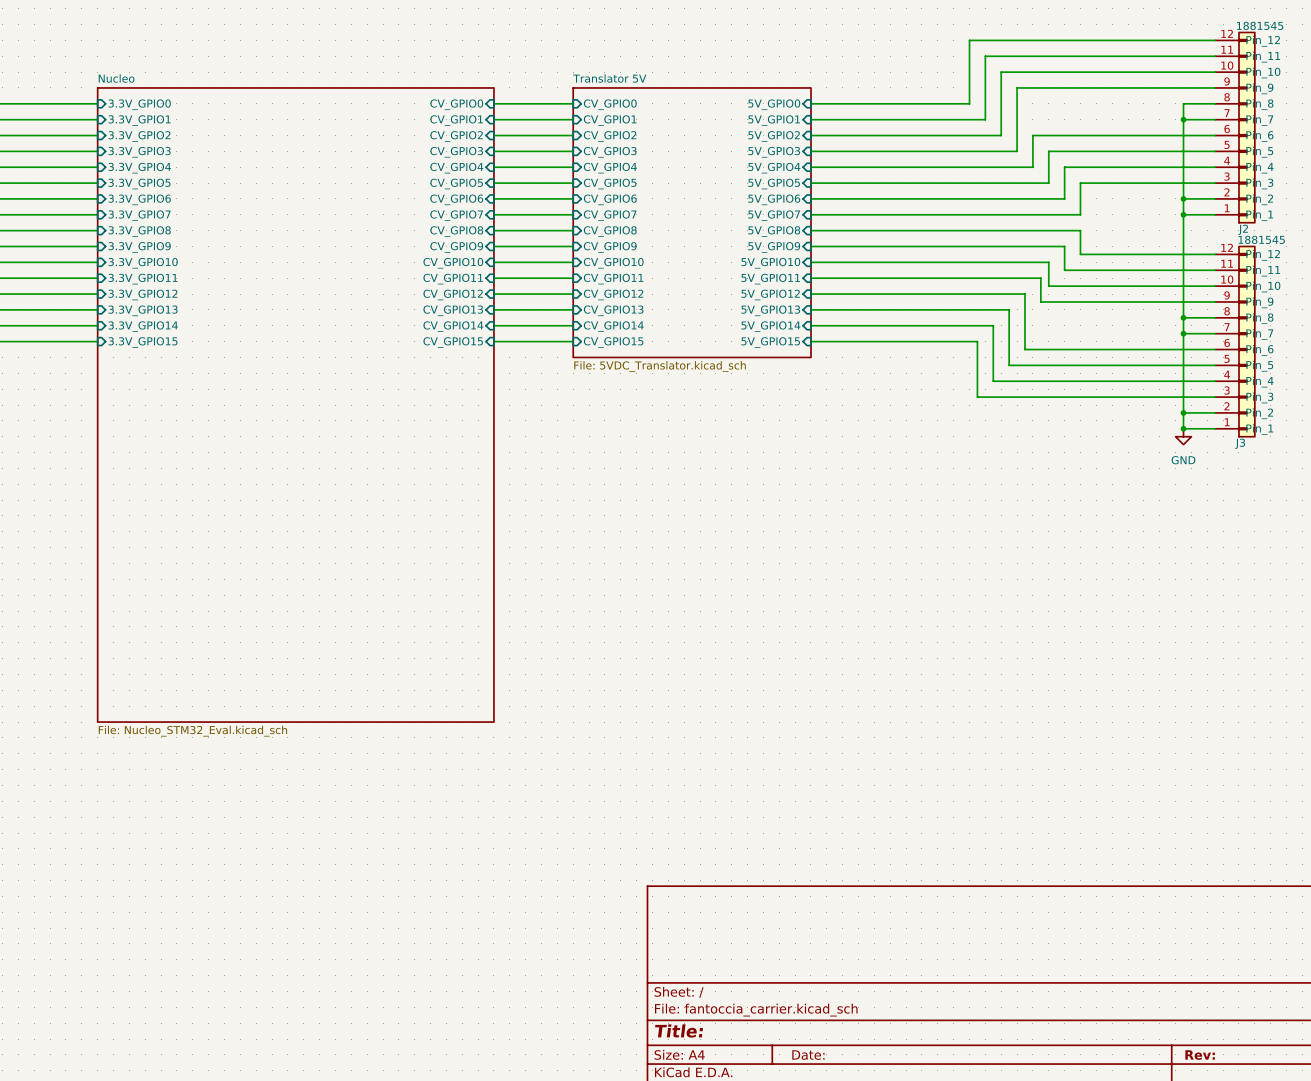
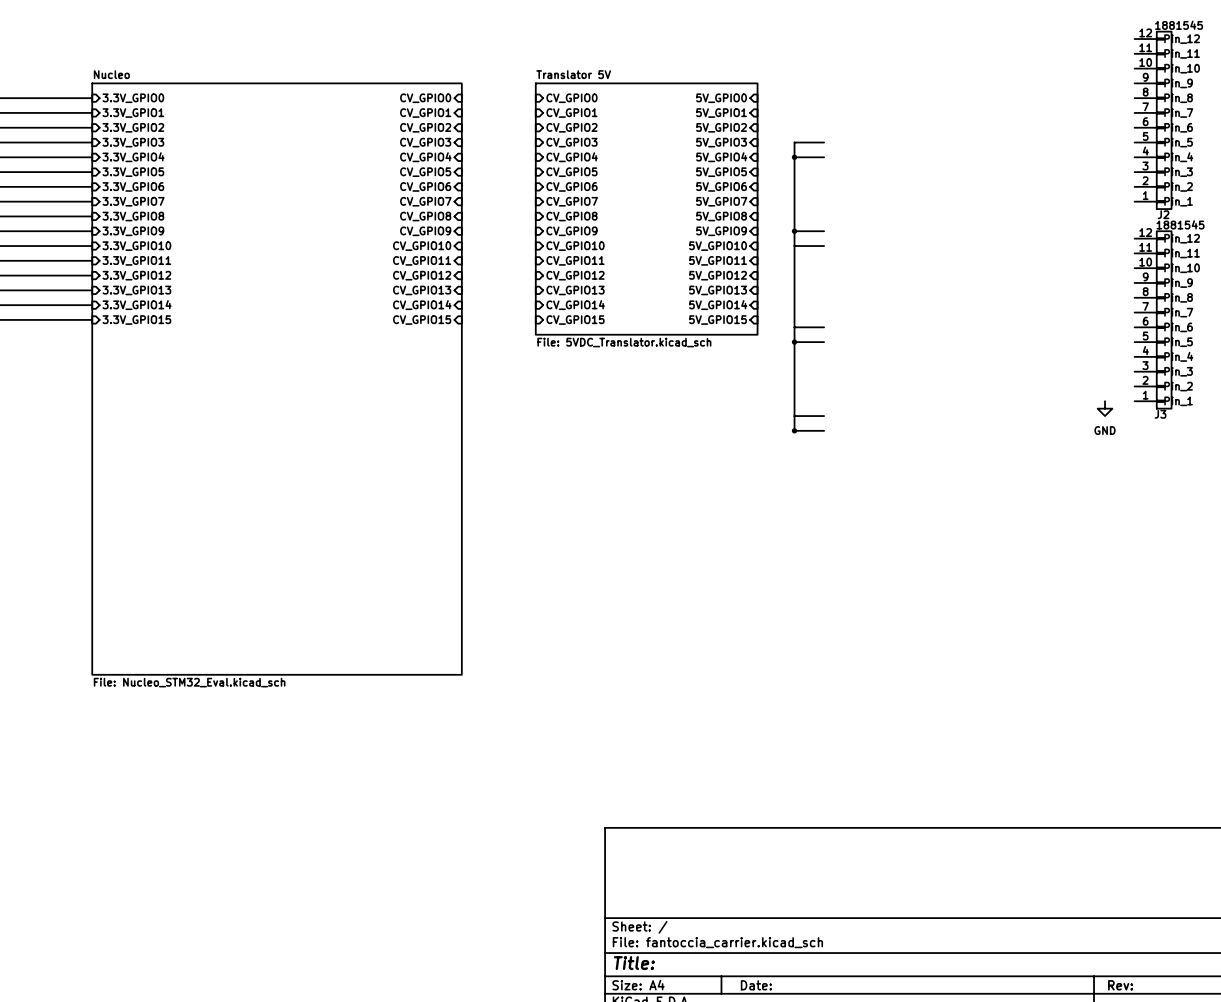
wire: (1215, 40) (969, 40) (969, 103) (810, 103) -> none
wire: (1215, 56) (985, 56) (985, 119) (810, 119) -> none
wire: (1215, 72) (1001, 72) (1001, 135) (810, 135) -> none
wire: (1215, 87) (1017, 87) (1017, 151) (882, 151) -> none
wire: (493, 103) (573, 103) -> none
wire: (1215, 103) (1183, 103) (1183, 428) (1215, 428) -> none
wire: (493, 119) (573, 119) -> none
wire: (1183, 119) (1215, 119) -> none
junction: (1183, 119) -> none
wire: (493, 135) (573, 135) -> none
wire: (1215, 135) (1032, 135) (1032, 167) (882, 167) -> none
wire: (493, 151) (573, 151) -> none
wire: (810, 151) (850, 151) -> (824, 430) (794, 430) (794, 142)
wire: (1215, 151) (1048, 151) (1048, 183) (810, 183) -> none
wire: (493, 167) (573, 167) -> none
wire: (810, 167) (850, 167) -> none
junction: none -> (794, 157)
wire: (1215, 167) (1064, 167) (1064, 198) (810, 198) -> none
wire: (493, 183) (573, 183) -> none
wire: (1215, 183) (1080, 183) (1080, 214) (810, 214) -> none
wire: (493, 198) (573, 198) -> none
wire: (1183, 198) (1215, 198) -> none
junction: (1183, 198) -> none
wire: (493, 214) (573, 214) -> none
wire: (1183, 214) (1215, 214) -> none
junction: (1183, 214) -> none
wire: (493, 230) (573, 230) -> none
wire: (810, 230) (1080, 230) (1080, 254) (1215, 254) -> none
wire: (493, 246) (573, 246) -> none
wire: (810, 246) (850, 246) -> none
junction: none -> (794, 231)
wire: (882, 246) (1064, 246) (1064, 270) (1215, 270) -> none
wire: (493, 262) (573, 262) -> none
wire: (810, 262) (850, 262) -> none
wire: (882, 262) (1048, 262) (1048, 286) (1215, 286) -> none
wire: (493, 278) (573, 278) -> none
wire: (810, 278) (1040, 278) (1040, 301) (1215, 301) -> none
wire: (493, 294) (573, 294) -> none
wire: (810, 294) (1024, 294) (1024, 349) (1215, 349) -> none
wire: (493, 309) (573, 309) -> none
wire: (810, 309) (1009, 309) (1009, 365) (1215, 365) -> none
wire: (1183, 317) (1215, 317) -> none
junction: (1183, 317) -> none
wire: (493, 325) (573, 325) -> none
wire: (810, 325) (993, 325) (993, 381) (1215, 381) -> none
wire: (1183, 333) (1215, 333) -> none
junction: (1183, 333) -> none
wire: (493, 341) (573, 341) -> none
wire: (810, 341) (977, 341) (977, 397) (1215, 397) -> none
wire: none -> (794, 327) (824, 327)
wire: none -> (794, 342) (824, 342)
junction: none -> (794, 342)
wire: (1183, 412) (1215, 412) -> none
junction: (1183, 412) -> none
junction: (1183, 428) -> none
wire: none -> (794, 416) (824, 416)
junction: none -> (794, 430)

